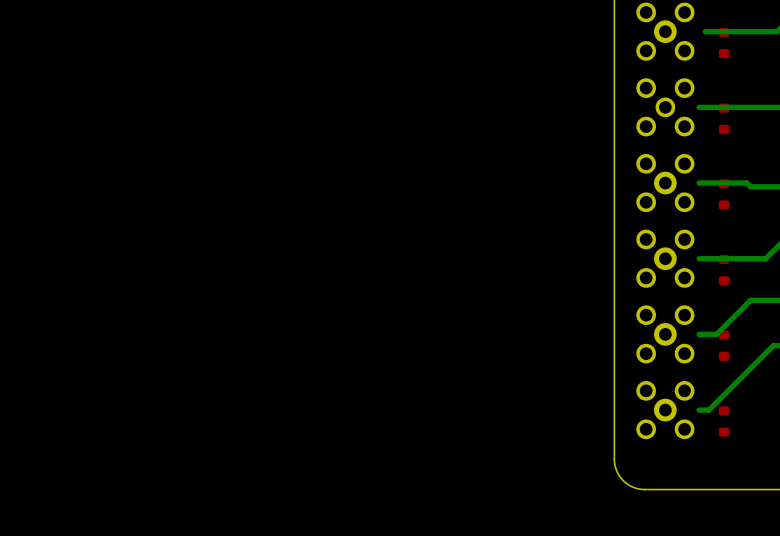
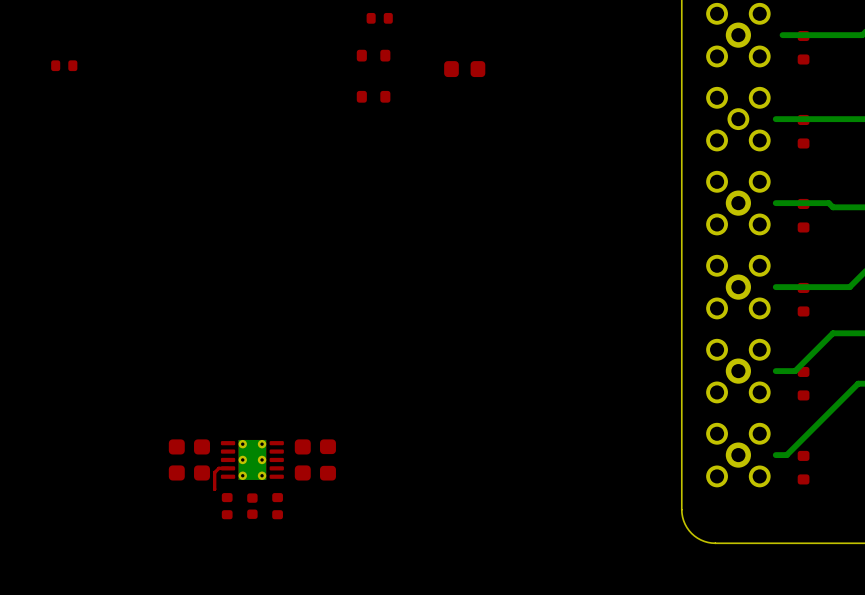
part: none -> (379, 18)
part: none -> (373, 55)
part: none -> (64, 65)
part: none -> (464, 69)
part: none -> (373, 96)
part: none -> (176, 459)
part: none -> (202, 459)
part: none -> (252, 459)
part: none -> (302, 459)
part: none -> (327, 459)
top track: none -> (228, 468) (218, 468) (214, 472) (214, 489)
part: none -> (227, 506)
part: none -> (252, 506)
part: none -> (277, 506)

